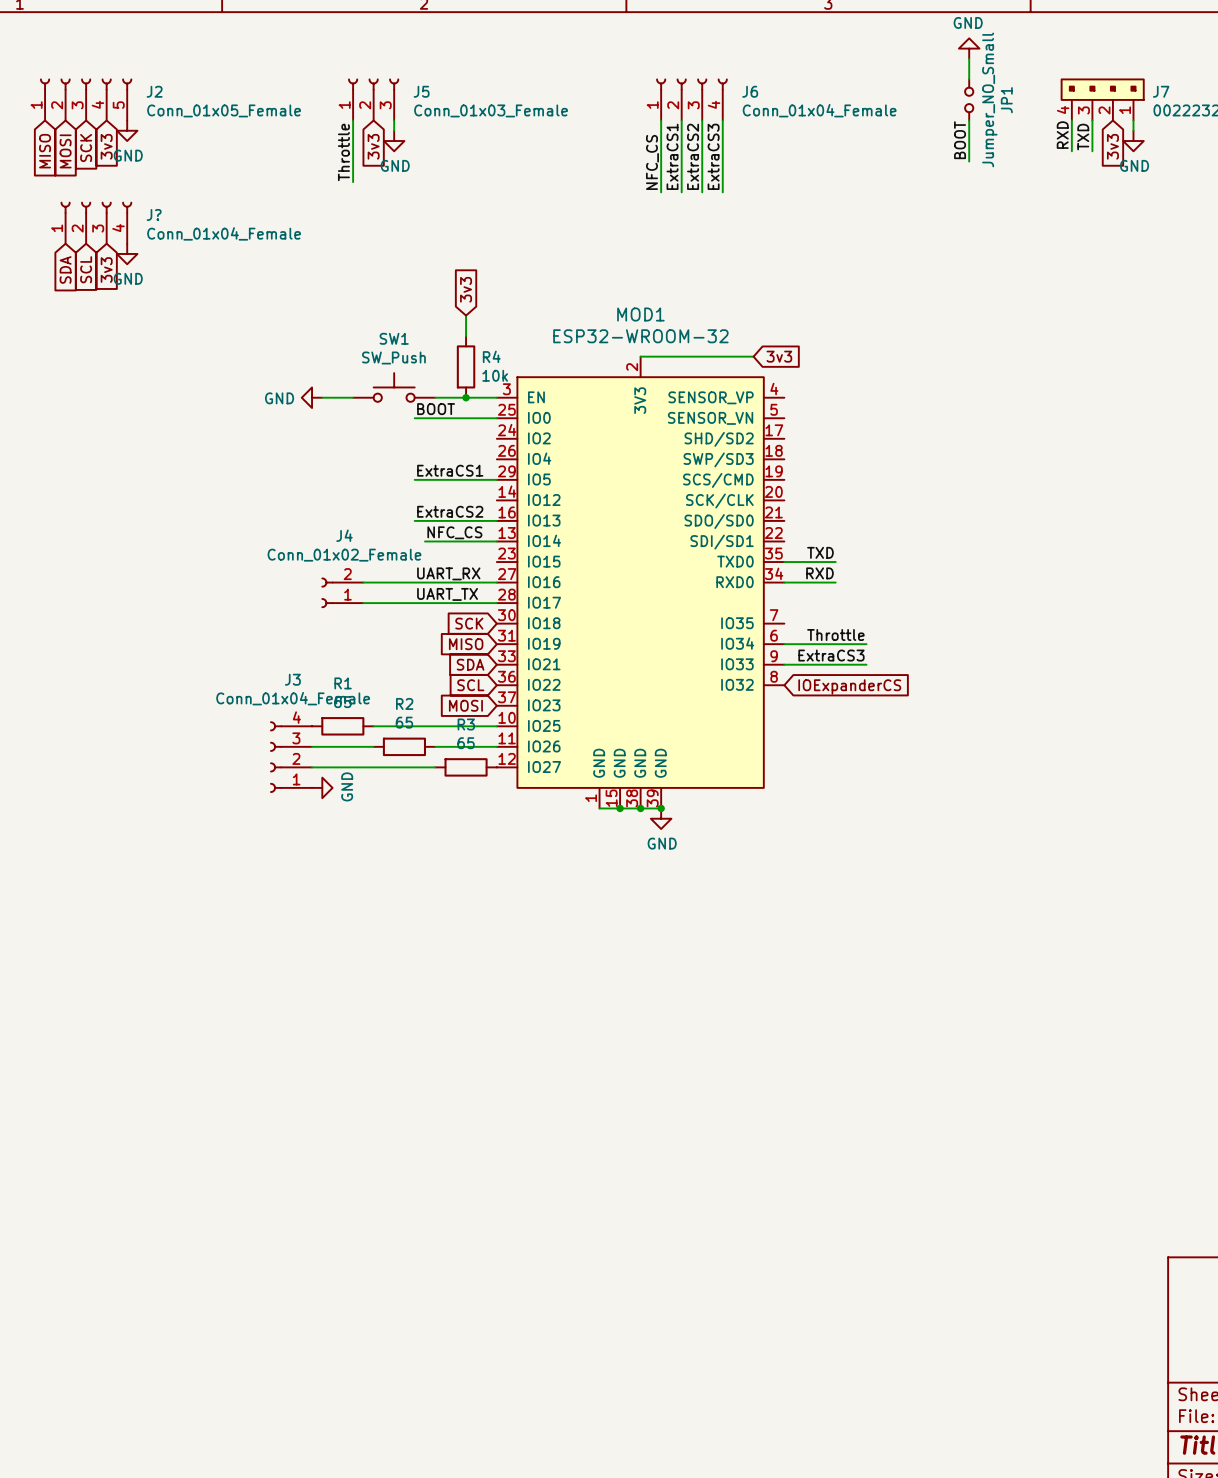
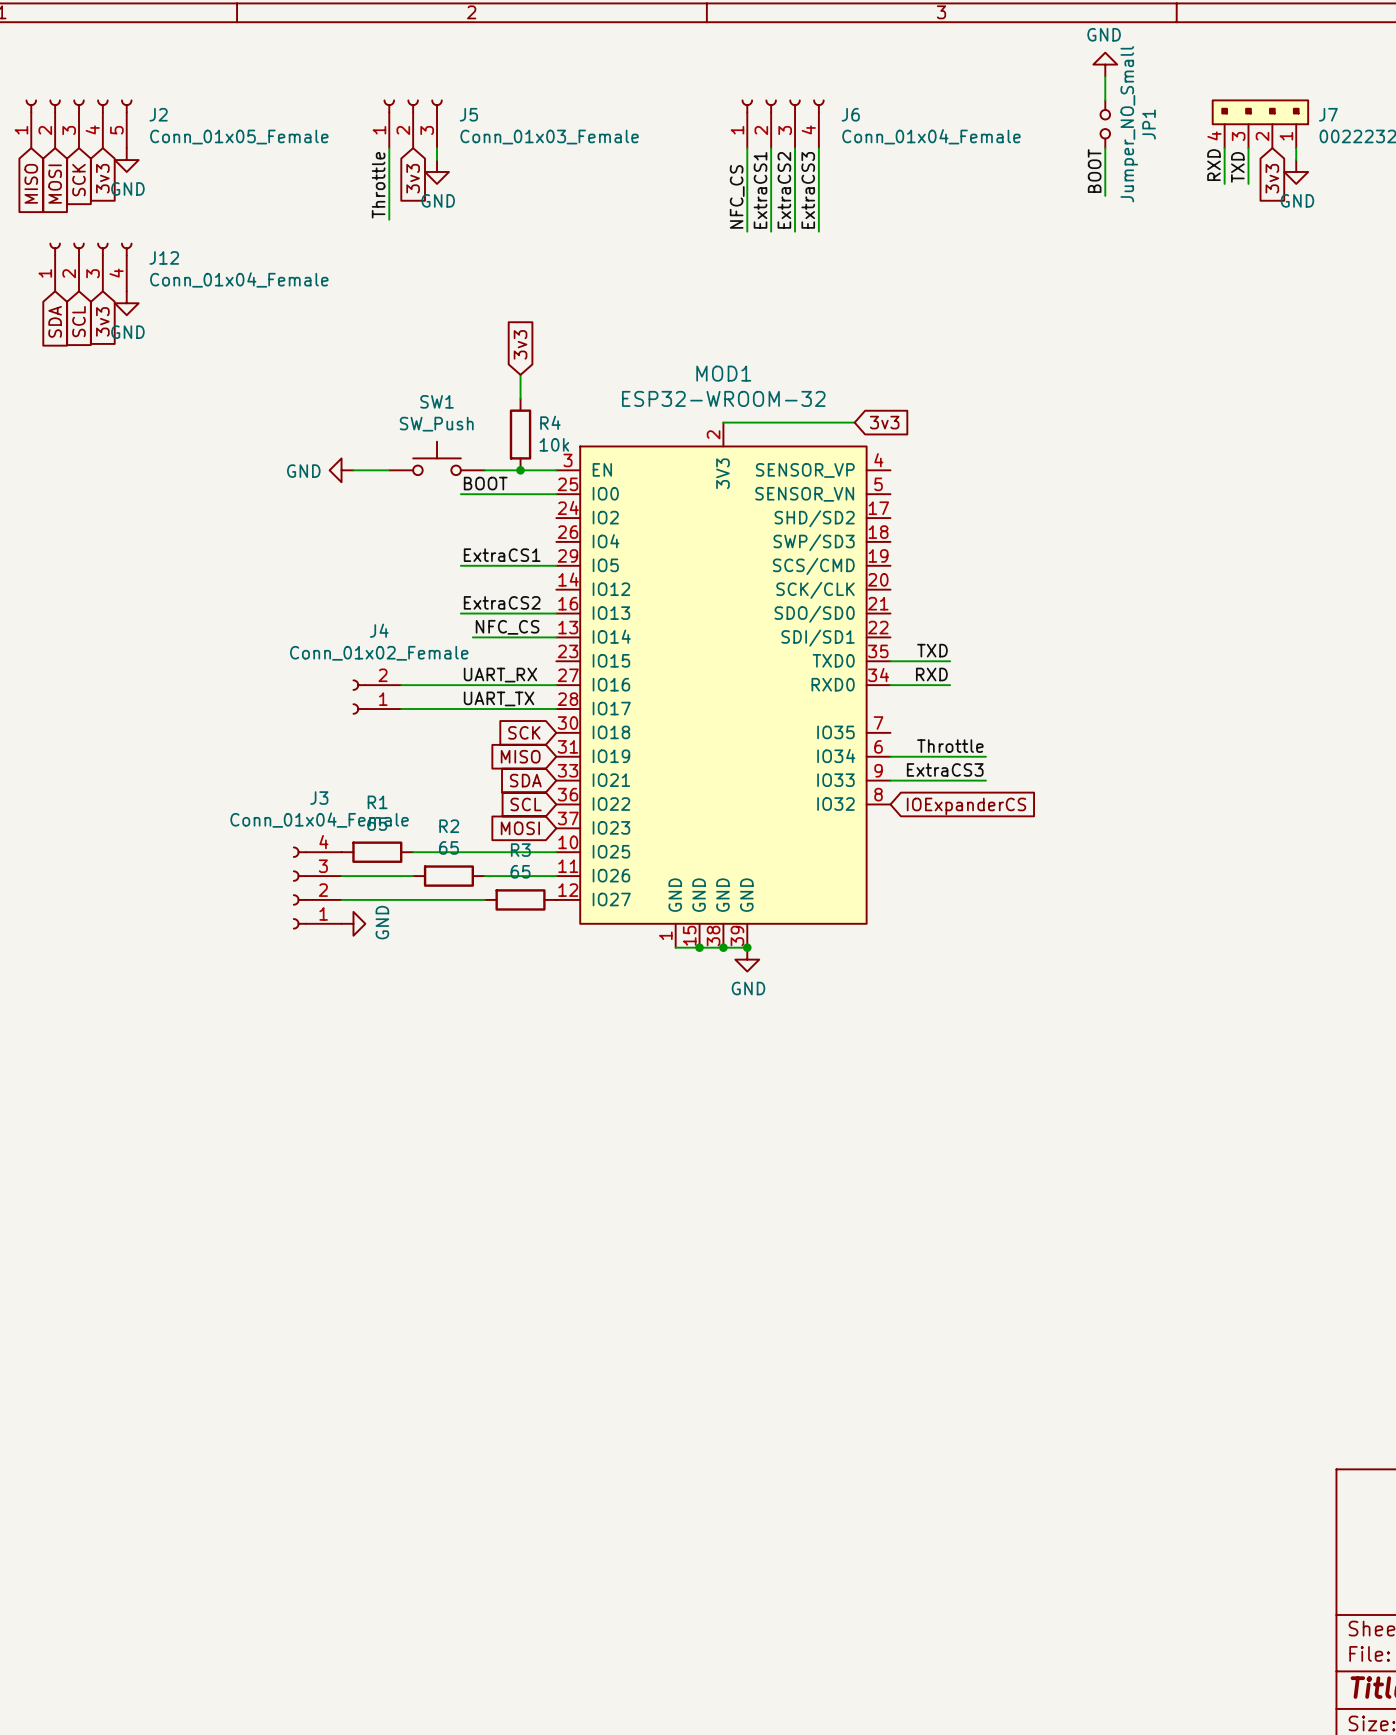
J? name: J? (154, 214) -> J12 (164, 257)

